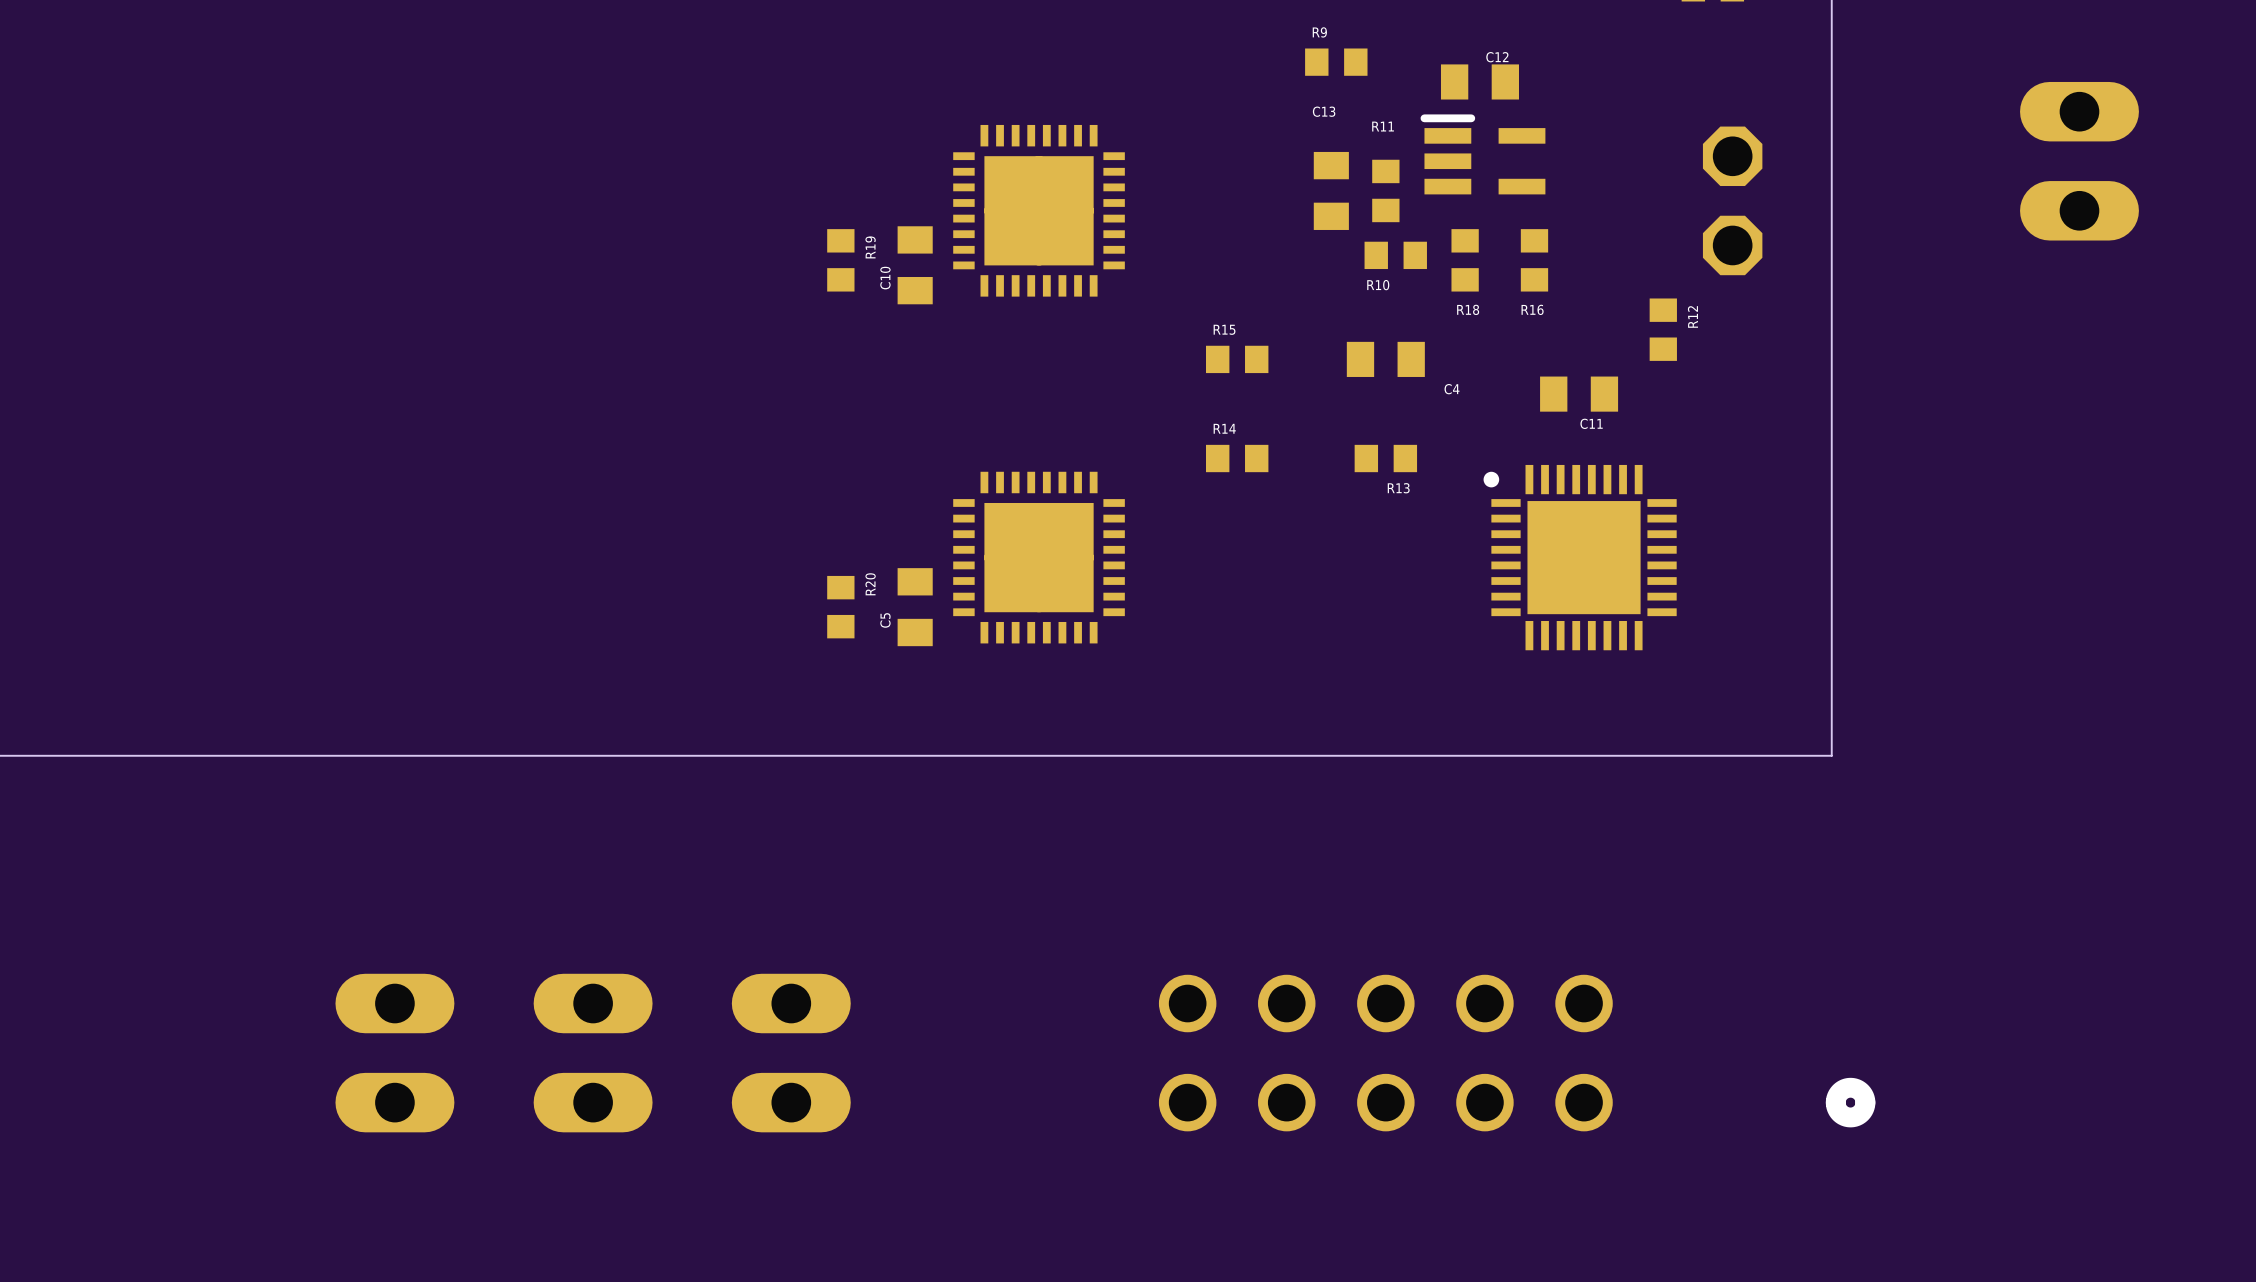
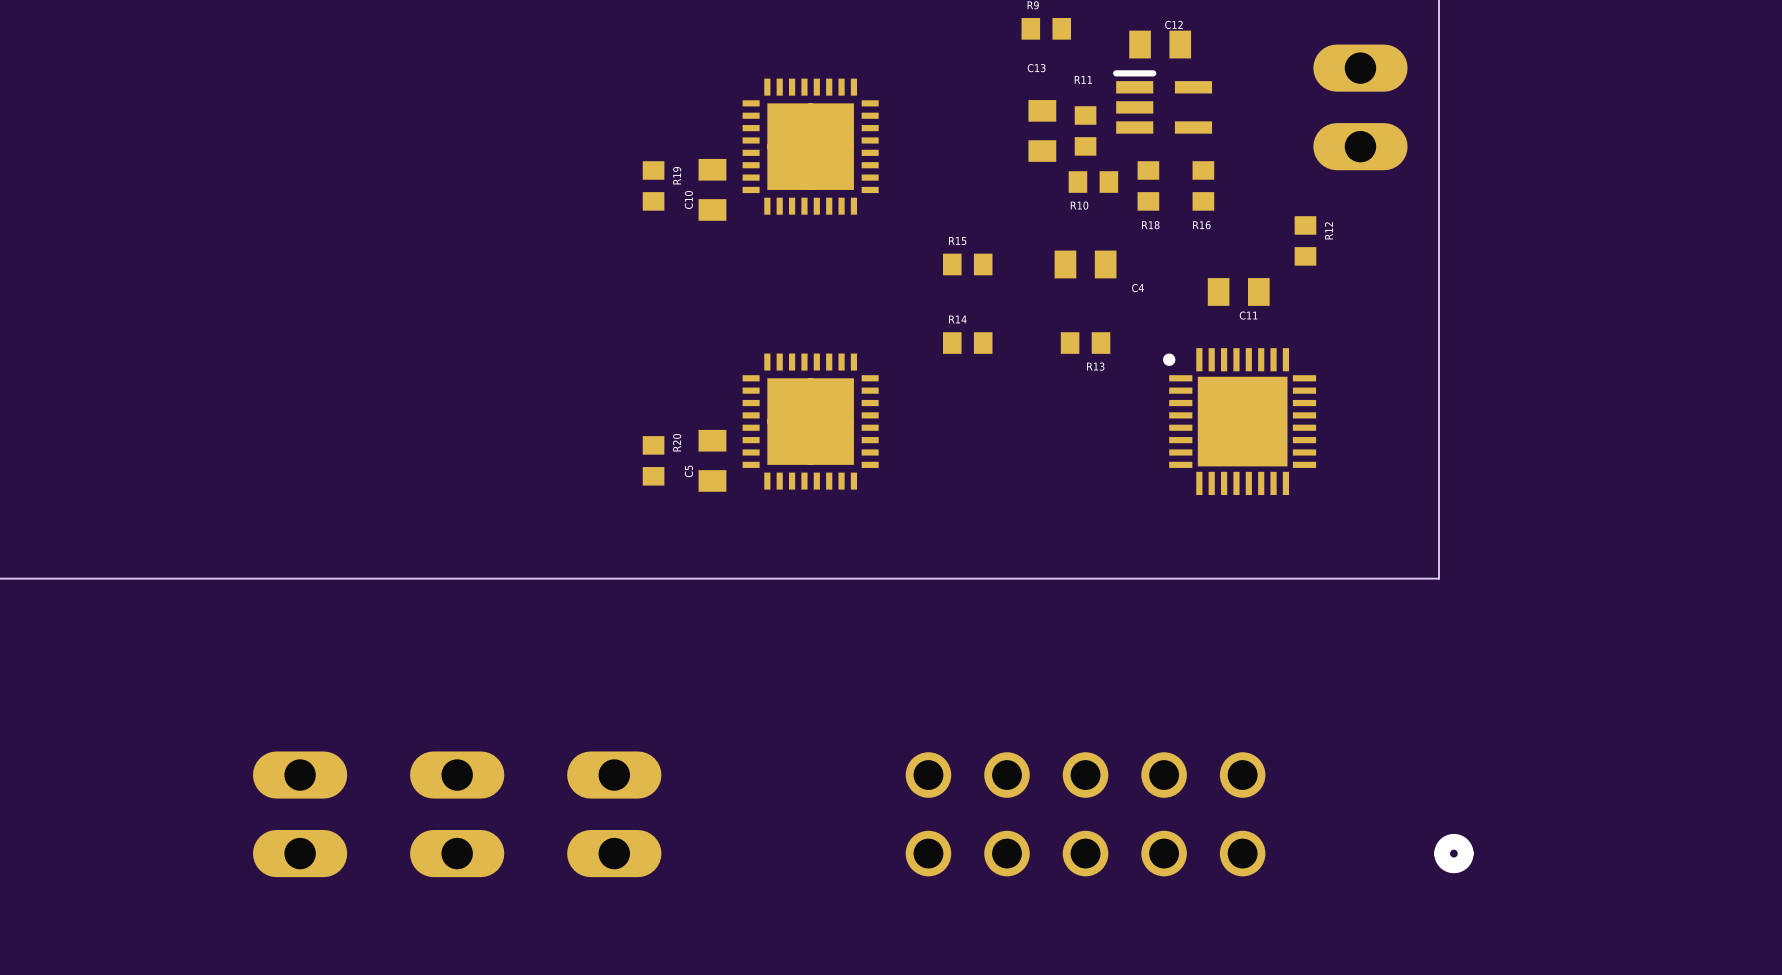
part footprint: [1702, 126, 1763, 187] -> [1313, 44, 1408, 171]
part: (2079, 161) -> none
part: (1732, 245) -> none

